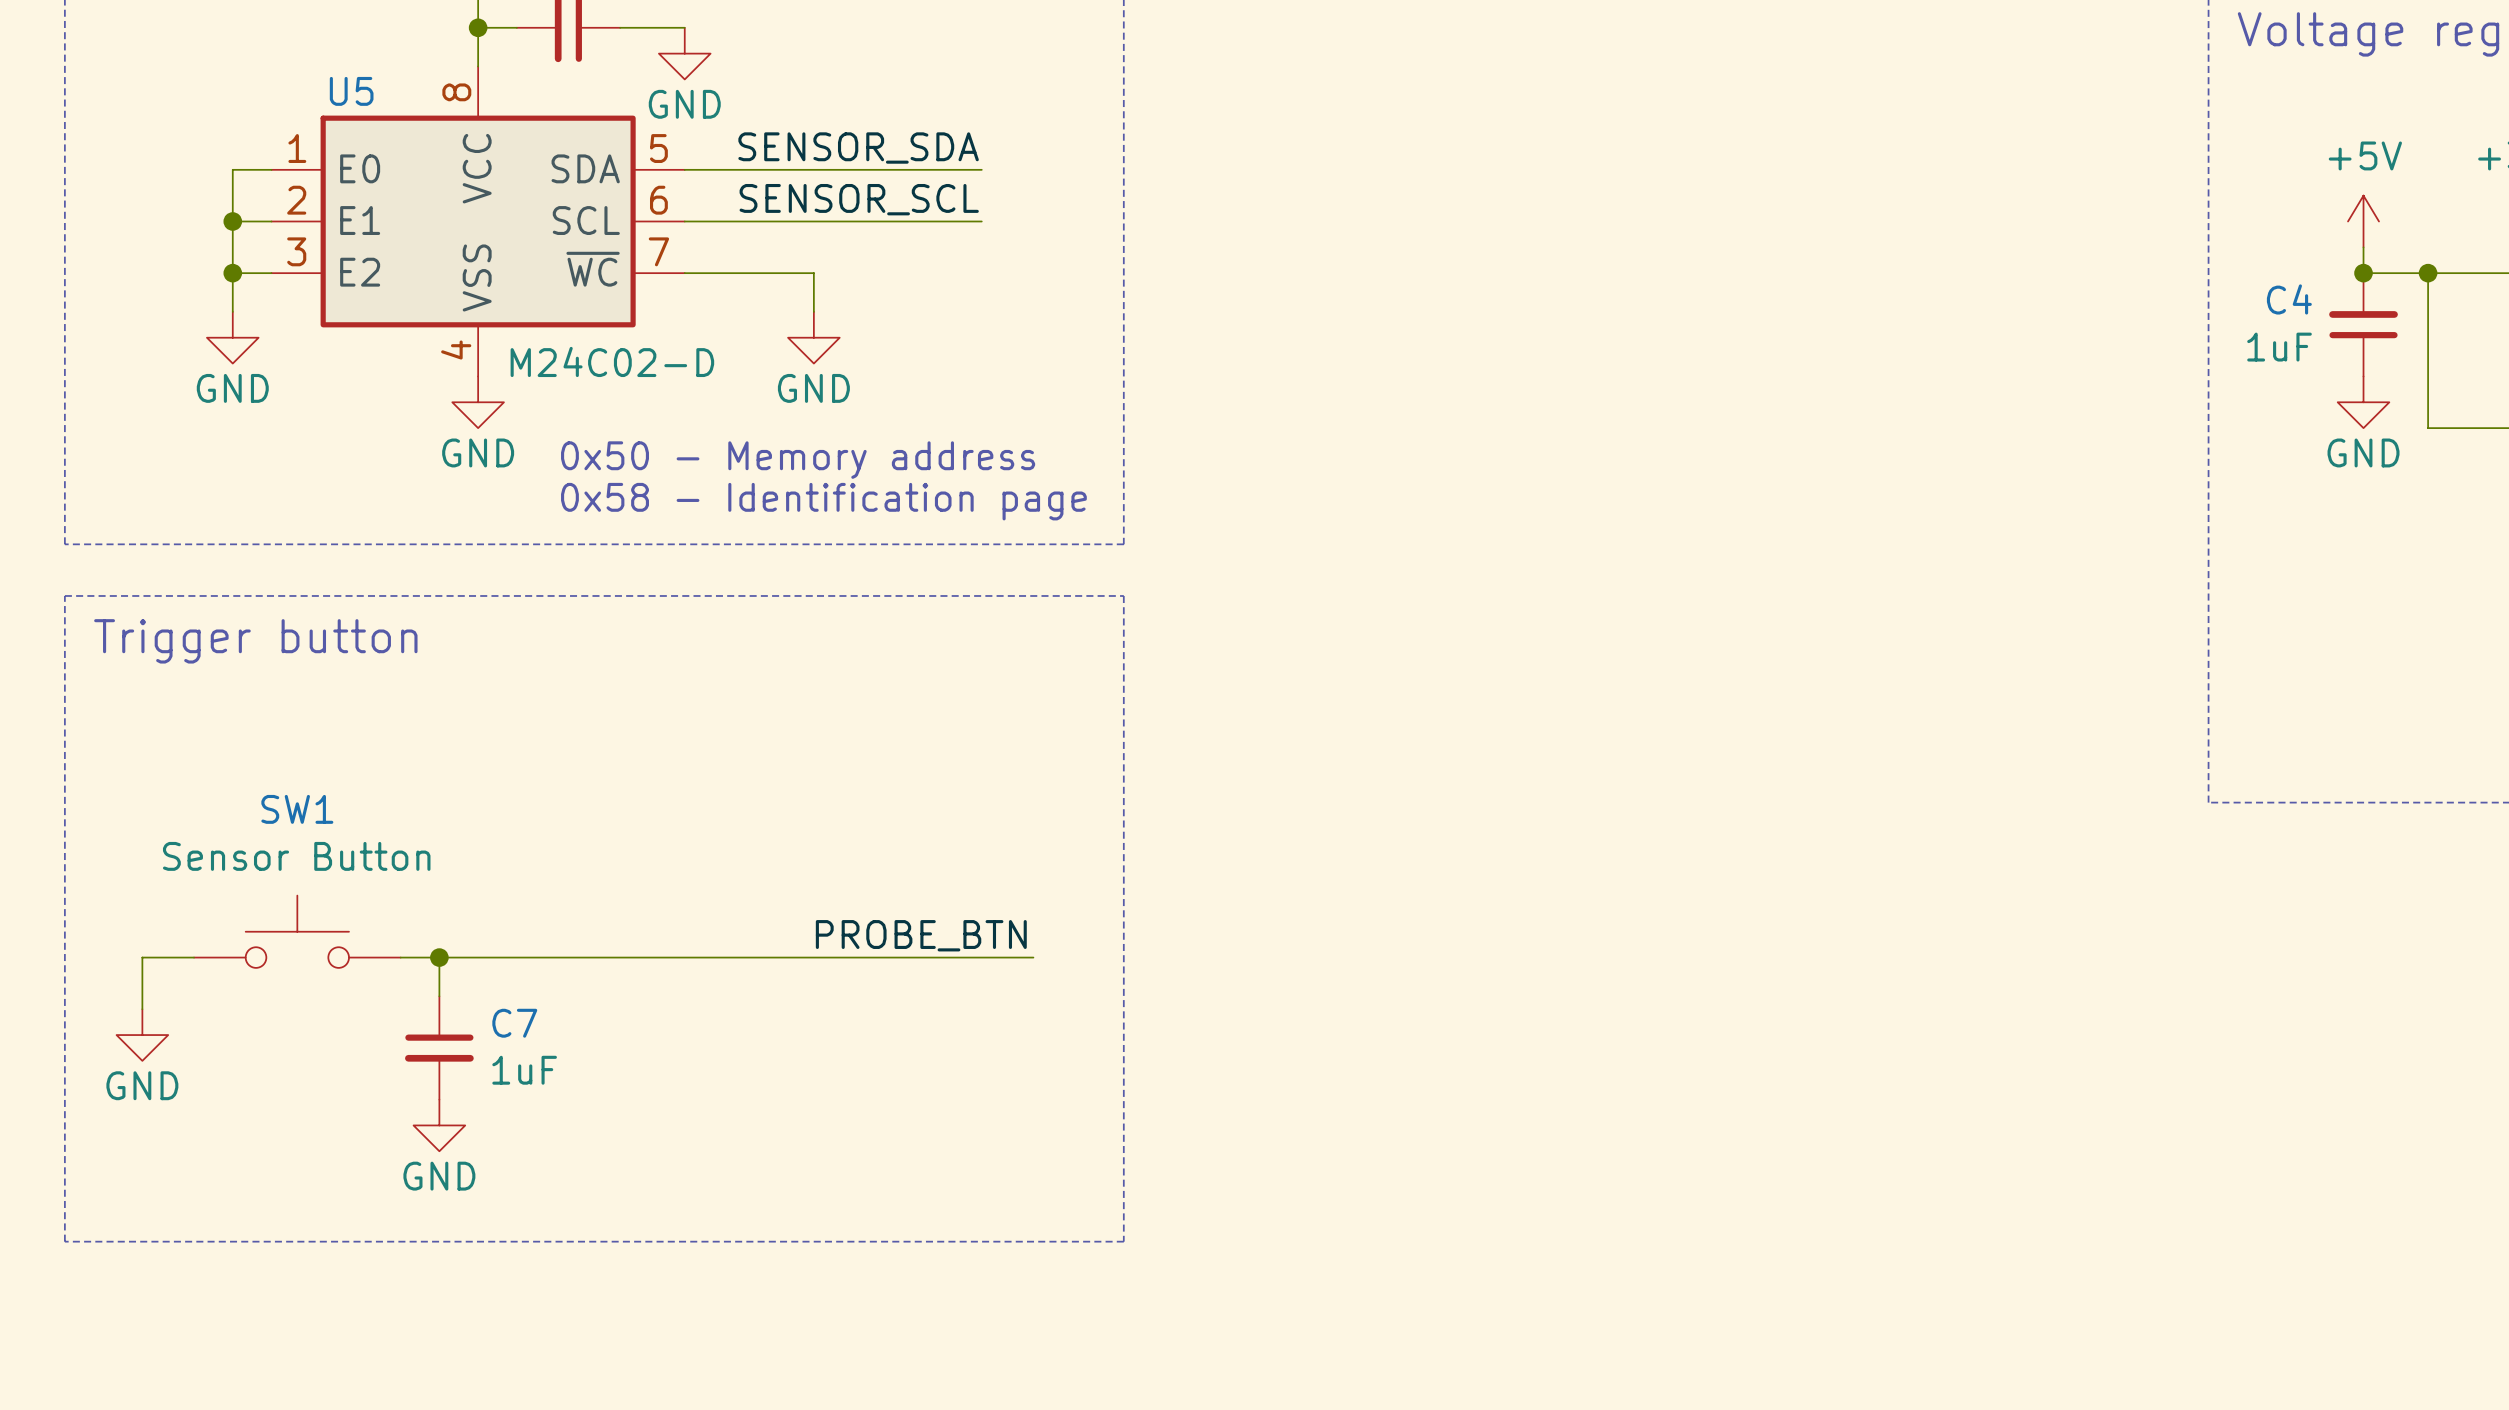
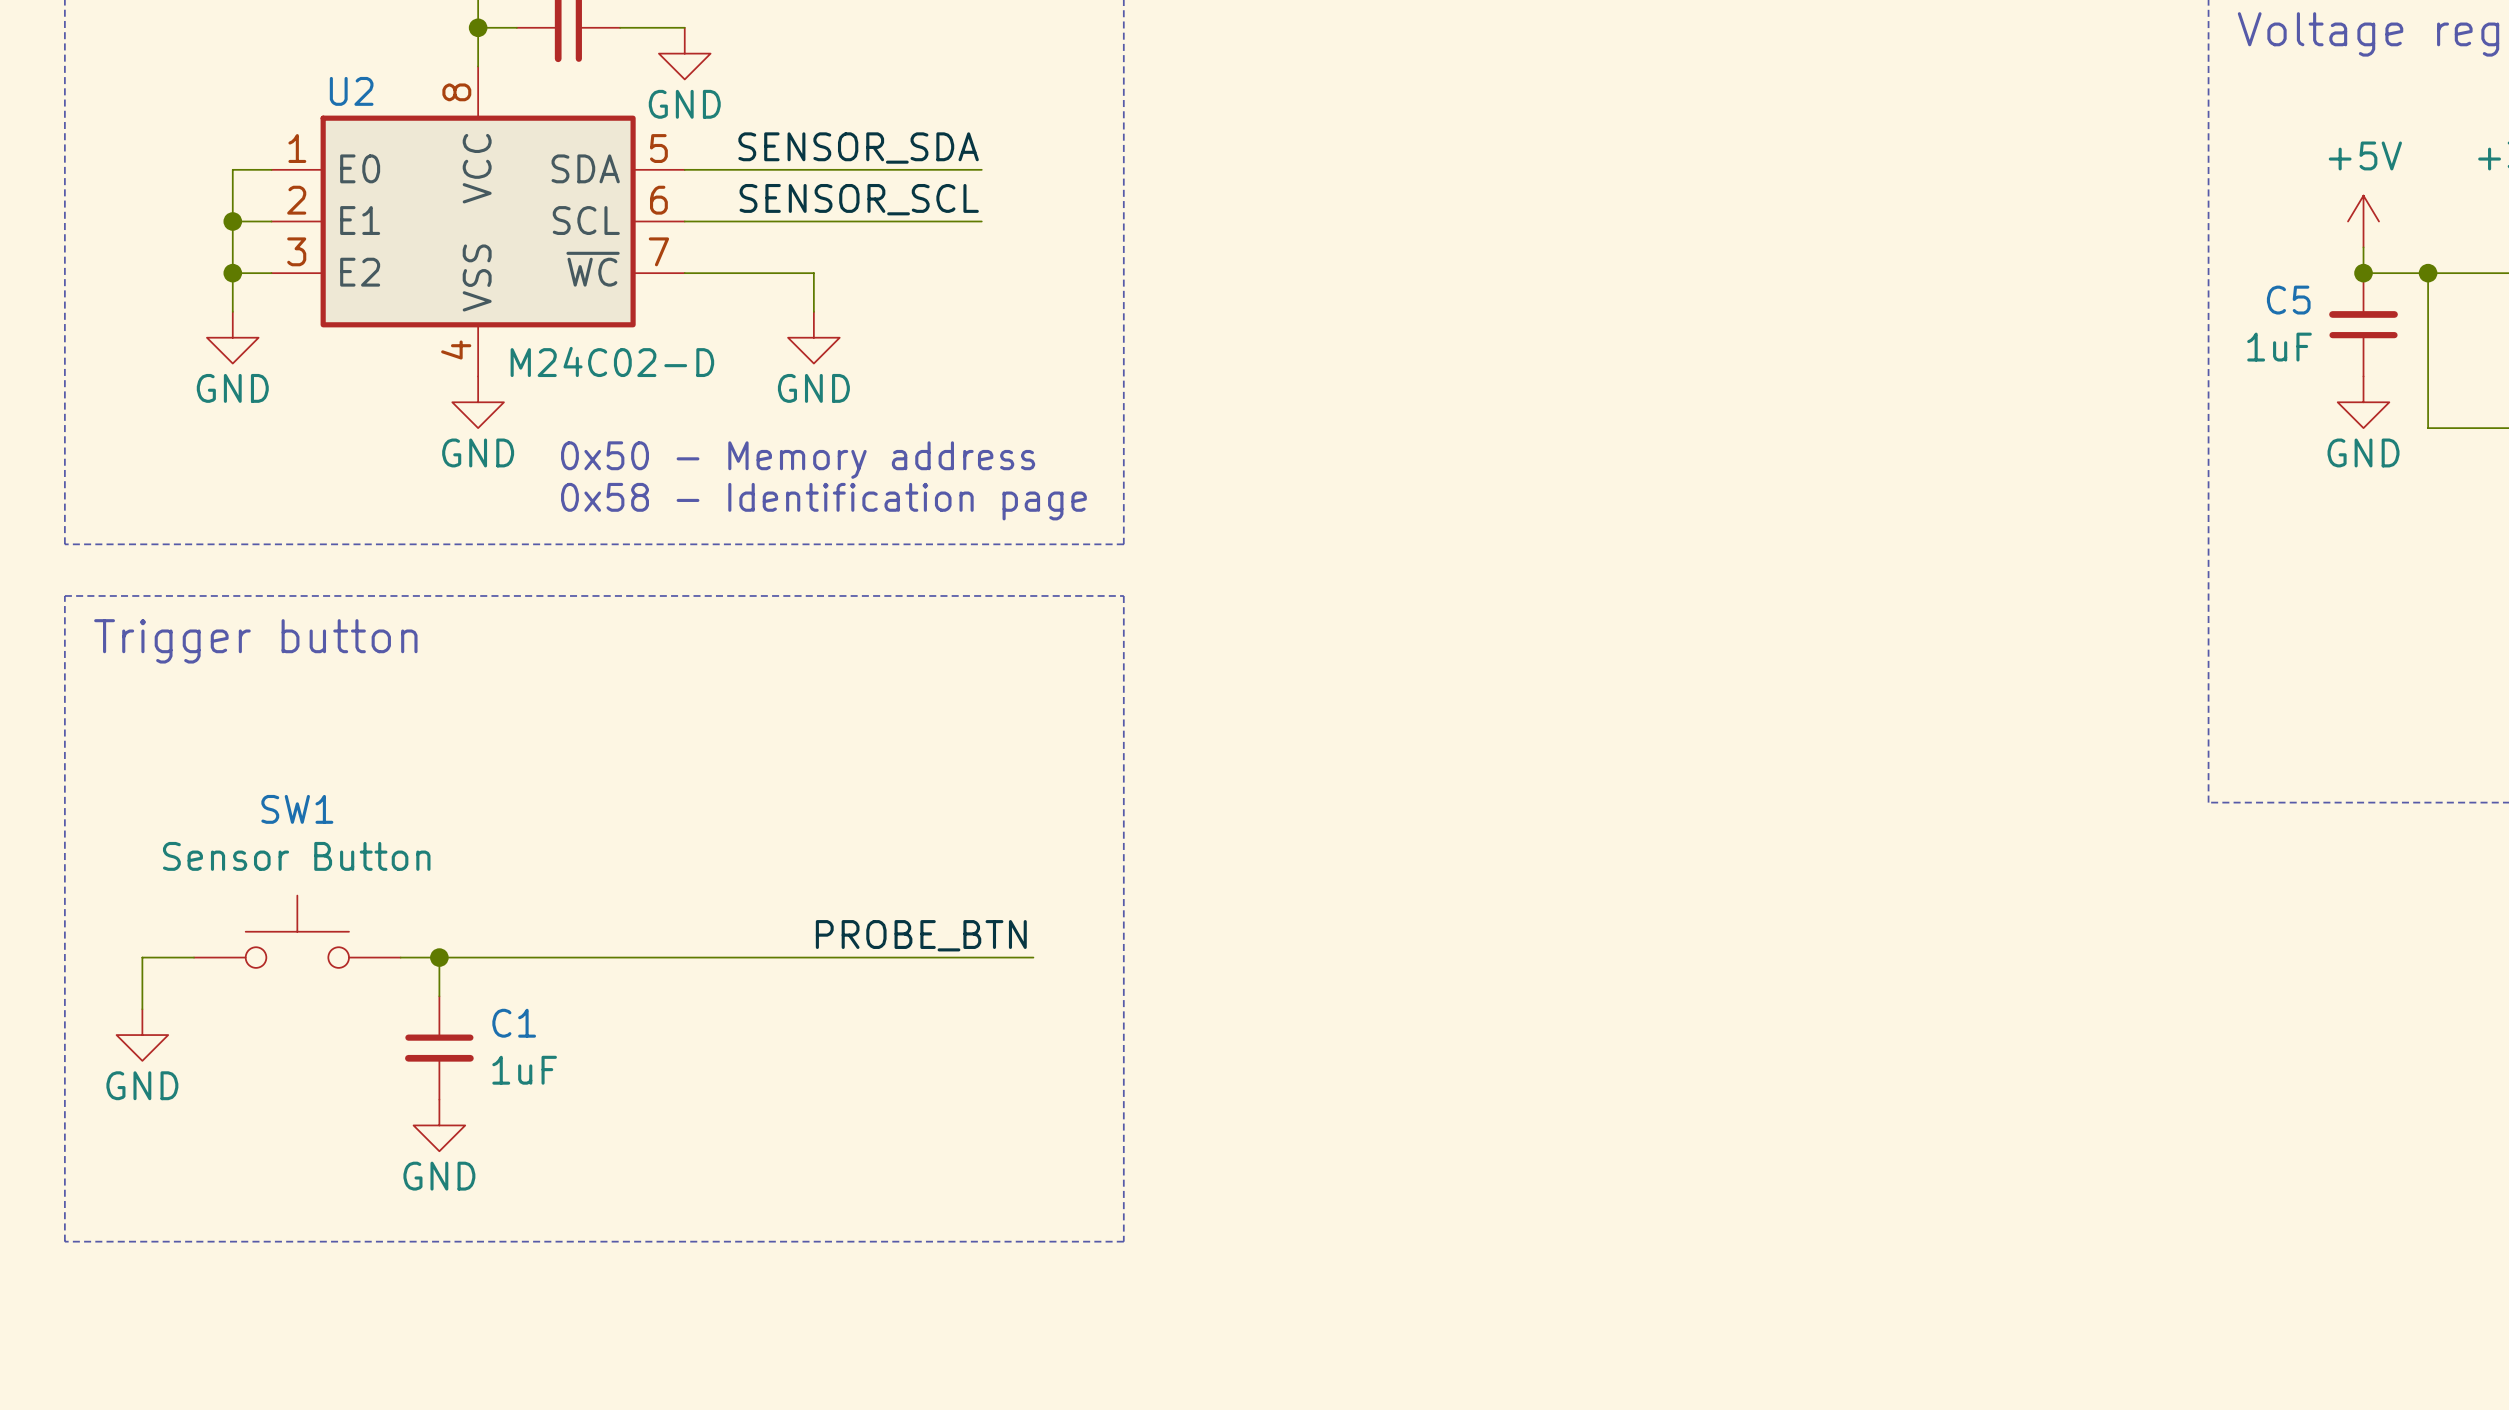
U5 name: U5 (351, 91) -> U2 (351, 91)
C4 name: C4 (2289, 299) -> C5 (2288, 300)
C7 name: C7 (514, 1023) -> C1 (514, 1023)

